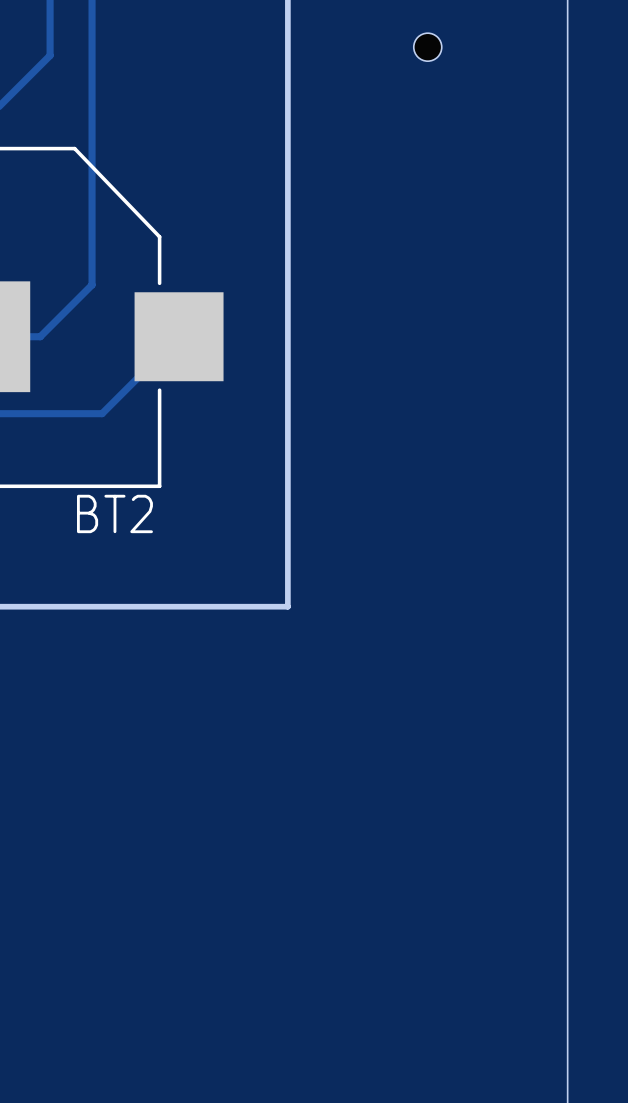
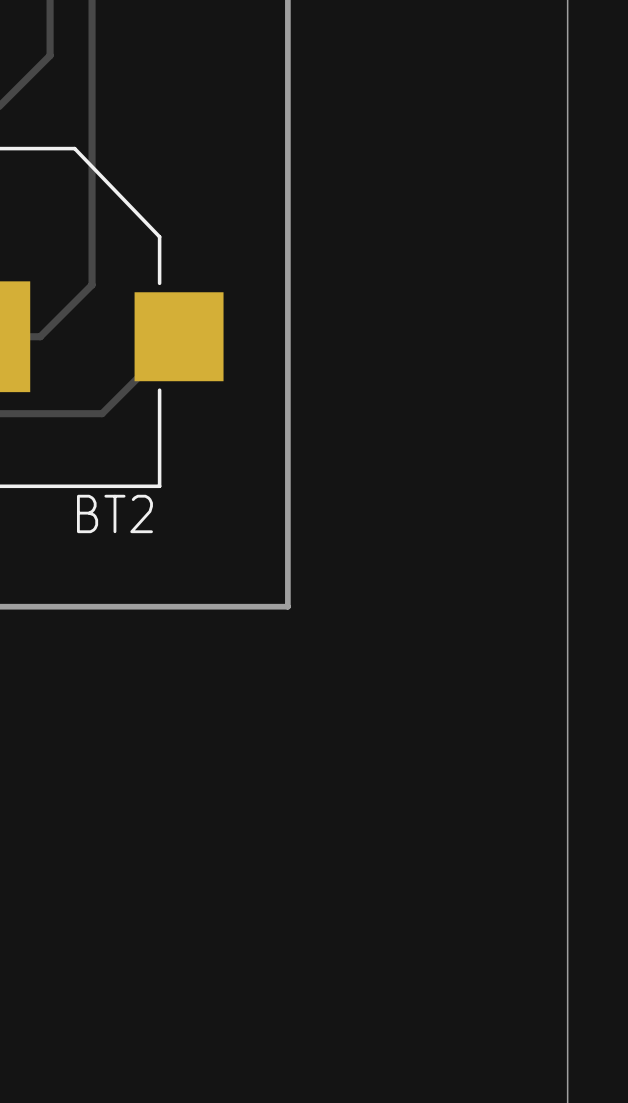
hole: (427, 47) -> none

